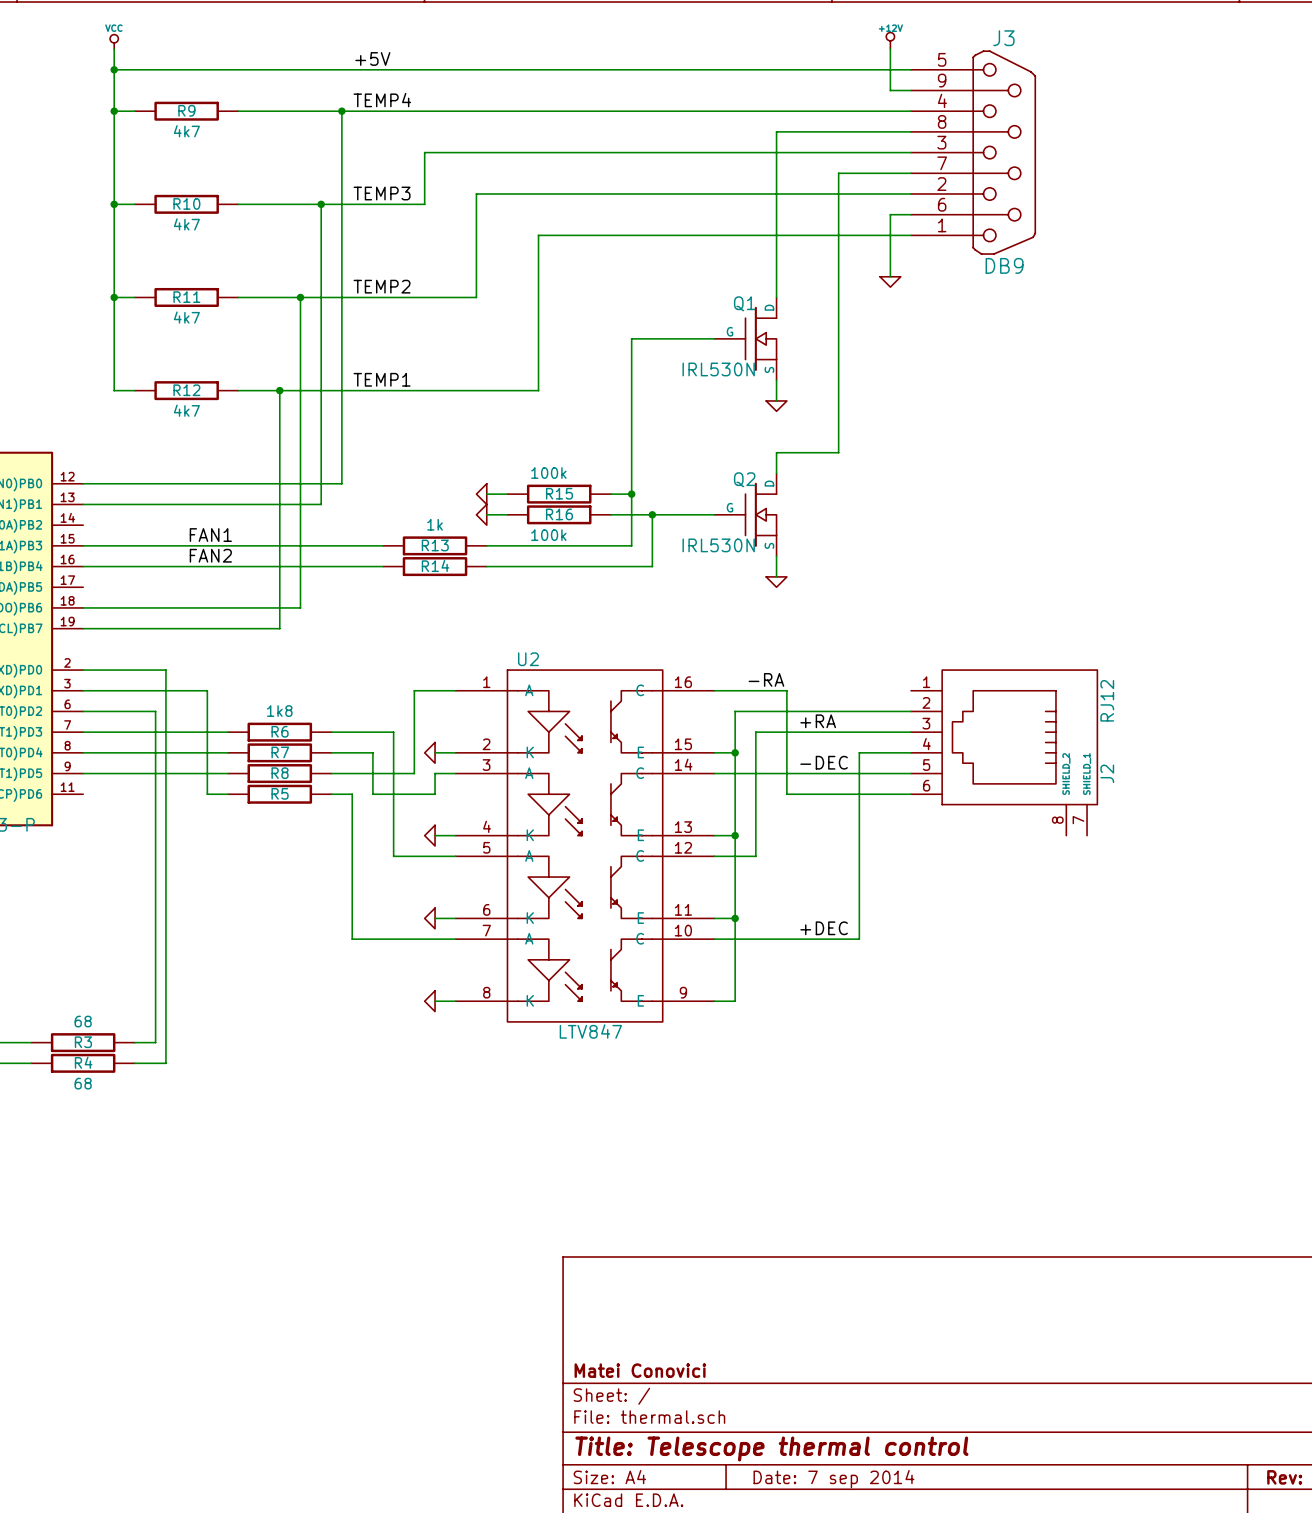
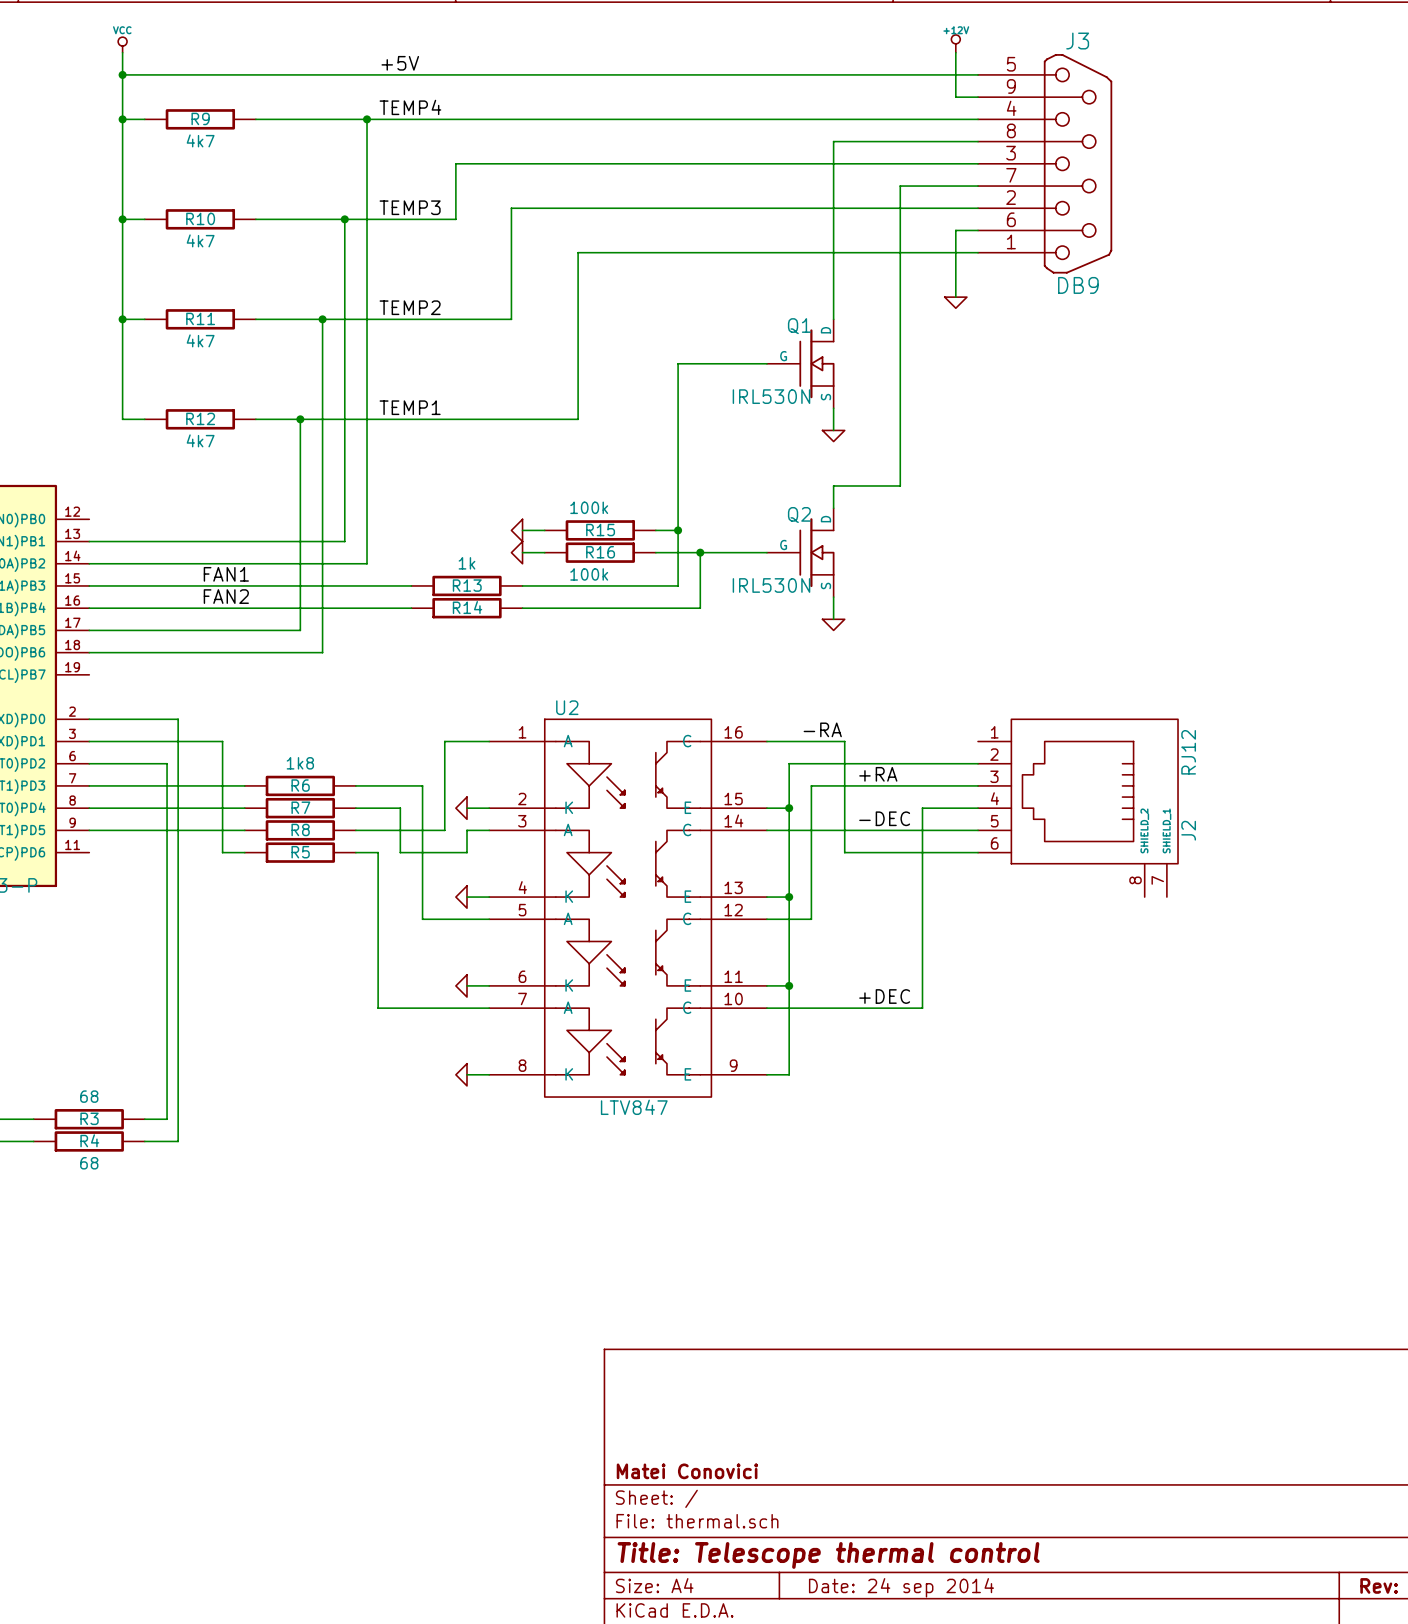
wire: (83, 483) (341, 483) -> (89, 563) (367, 563) (367, 519)
wire: (279, 587) (279, 628) (83, 628) -> (300, 630) (89, 630)
title block: Date: 7 sep 2014 (833, 1479) -> Date: 24 sep 2014 (901, 1587)

